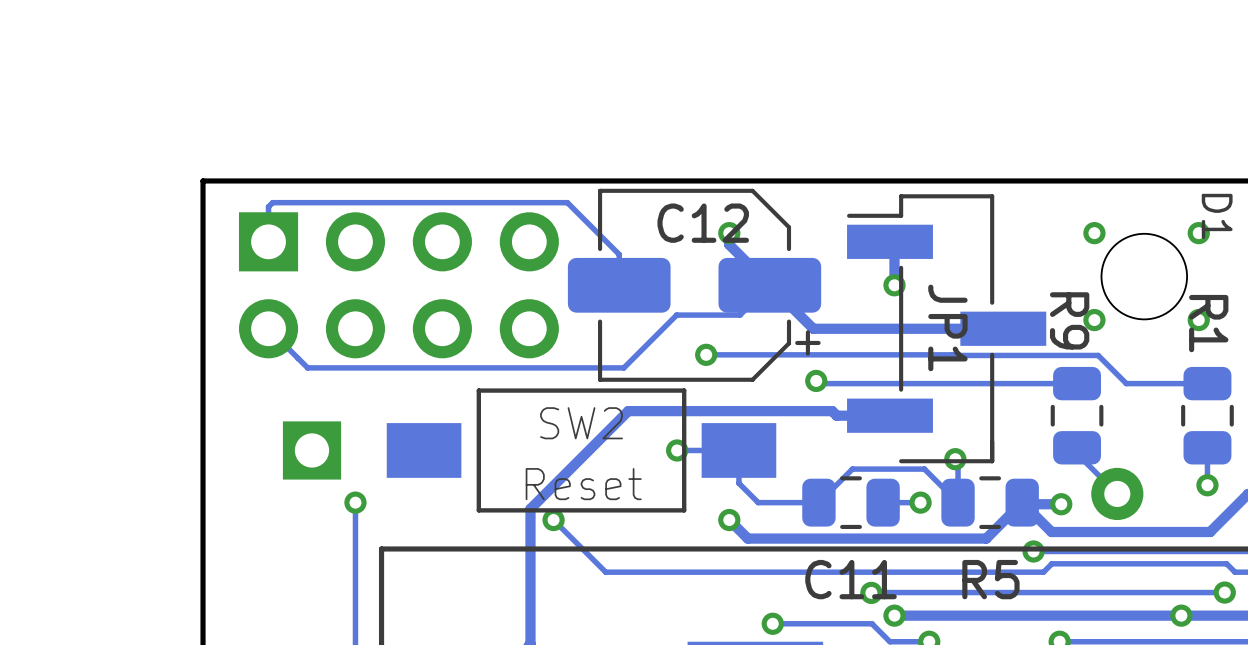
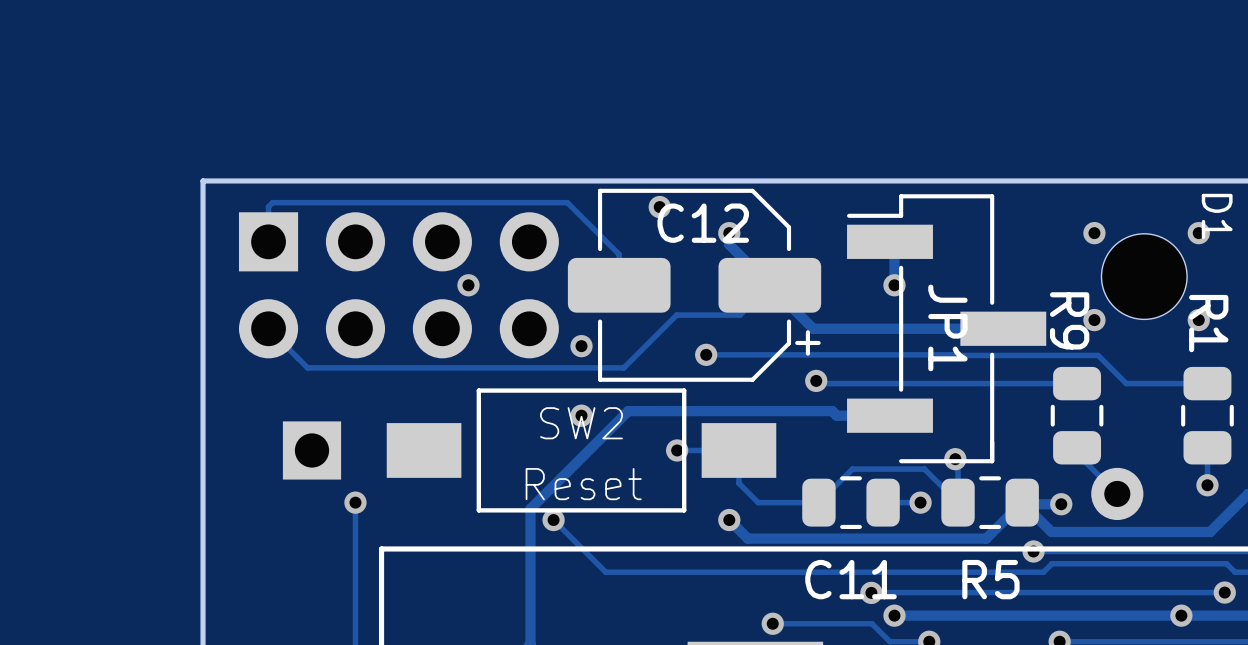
via: none -> (659, 207)
via: none -> (468, 285)
via: none -> (581, 346)
via: none -> (581, 415)

